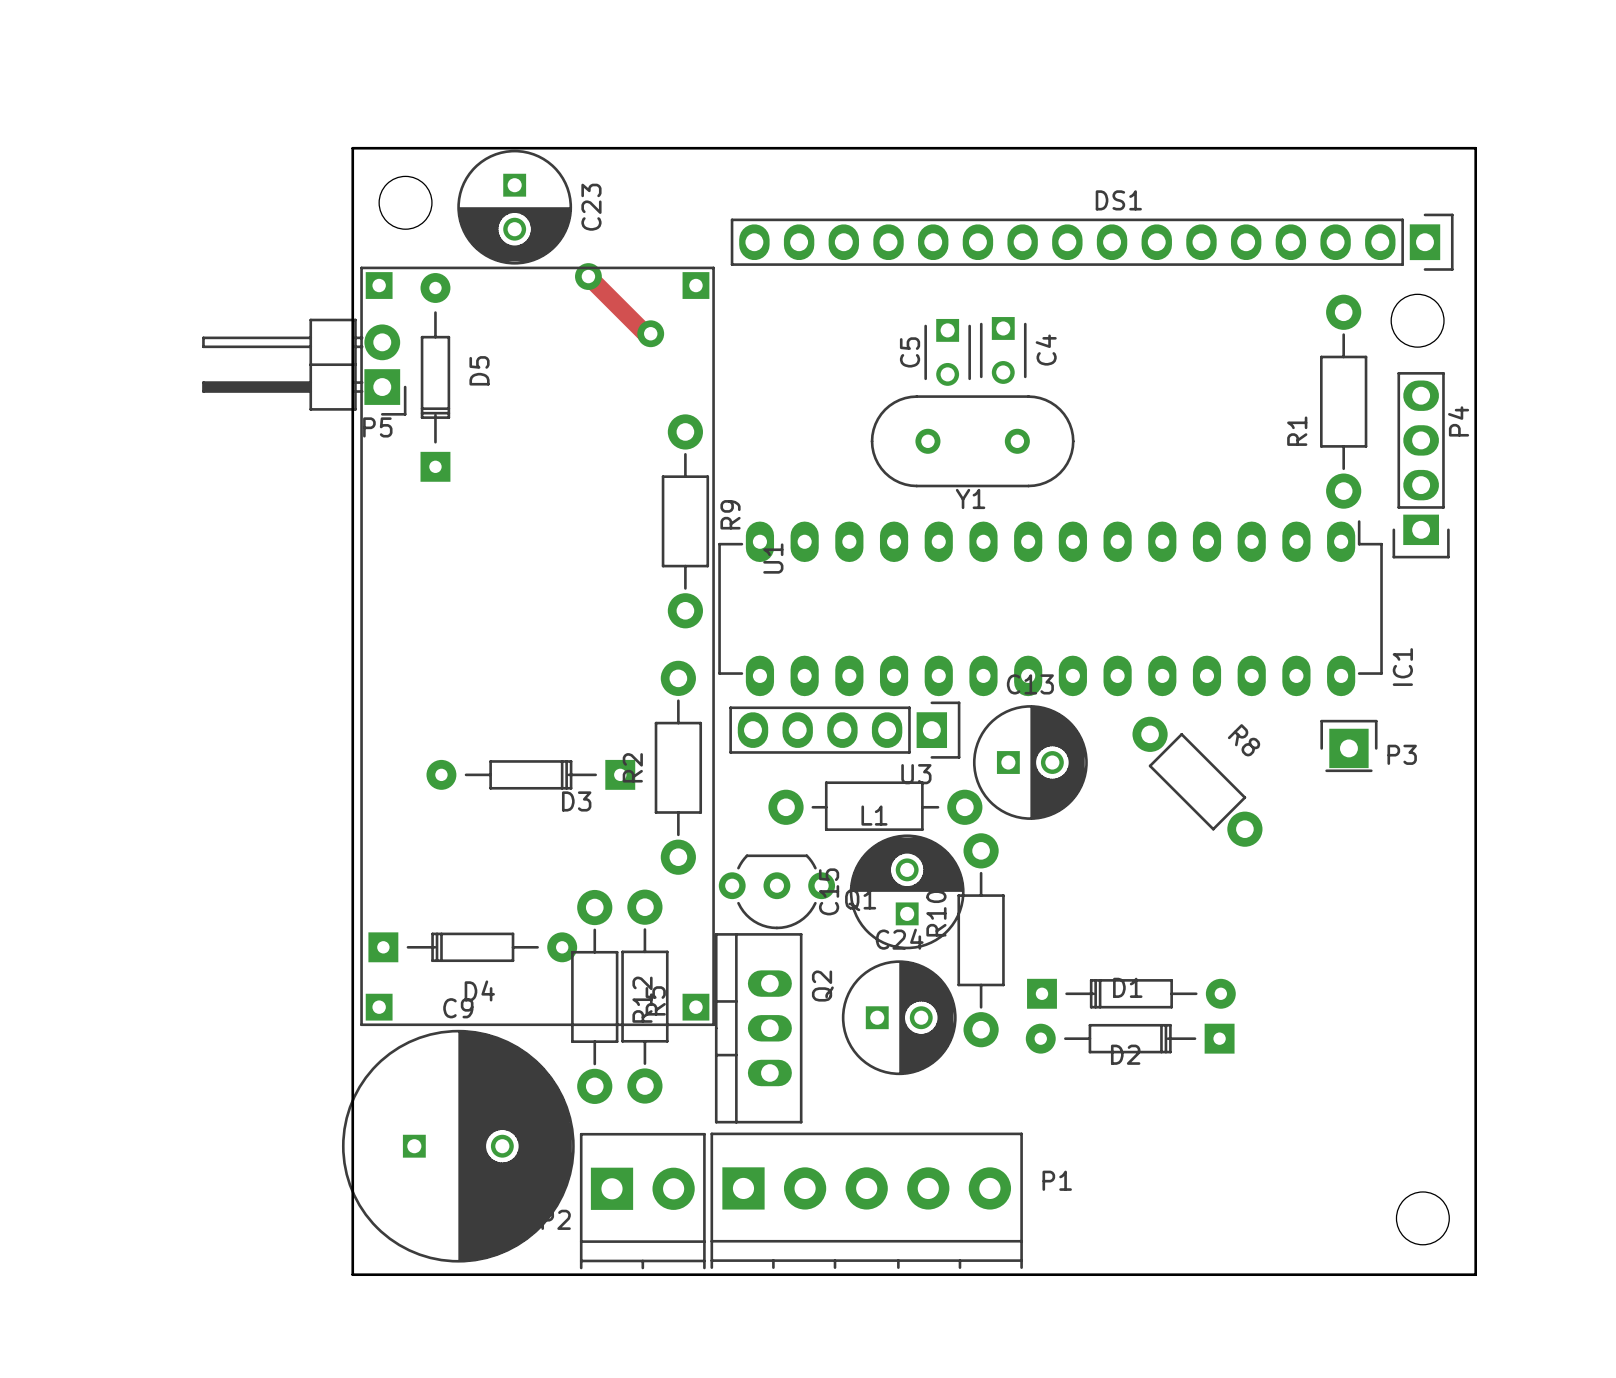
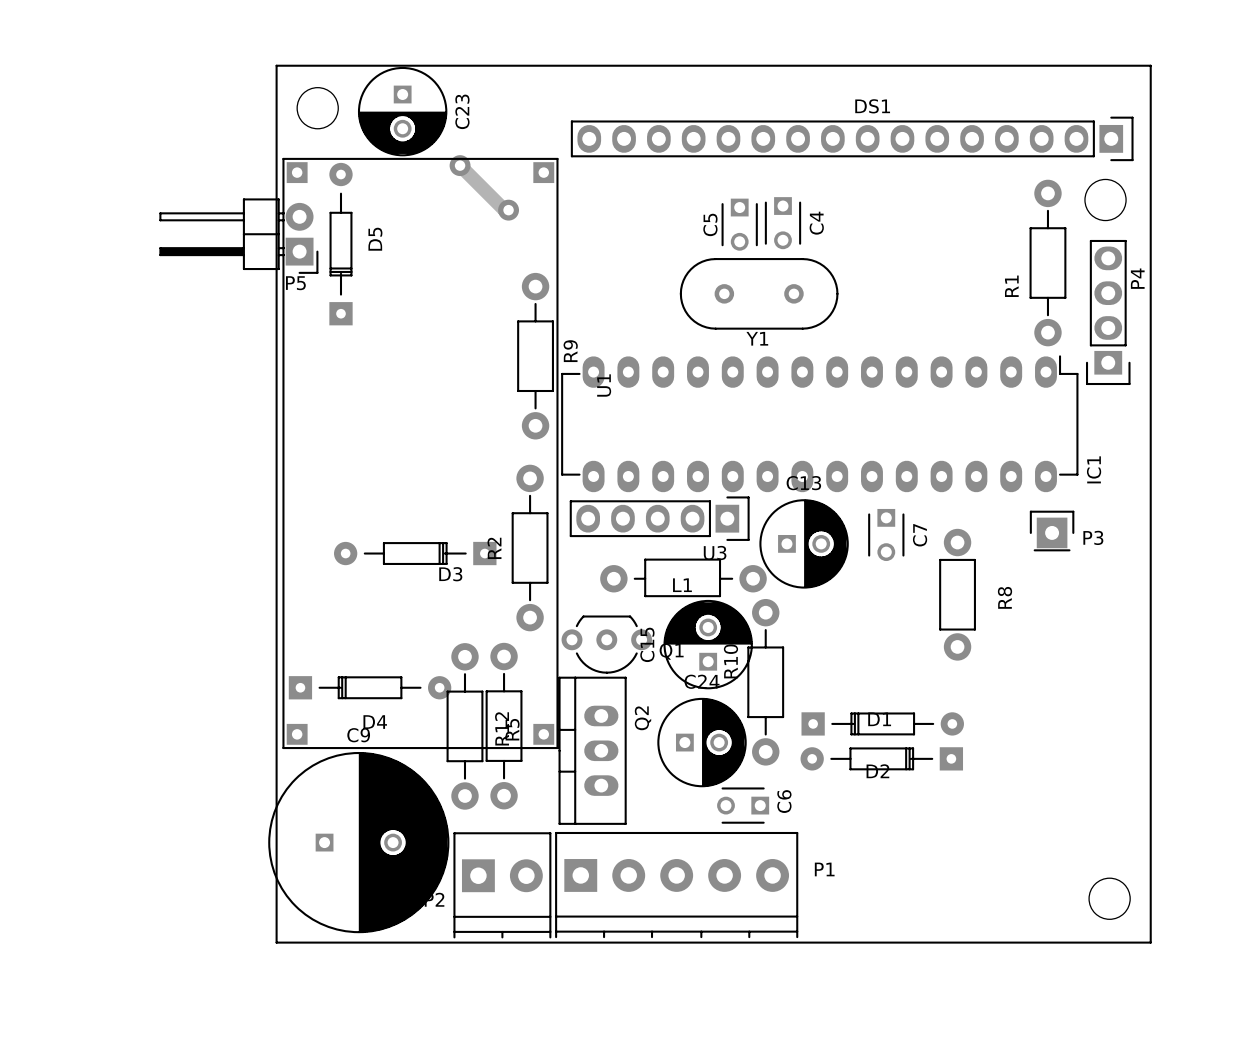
C7: none -> (886, 534)
R8 rotation: 0° (1197, 781) -> 45° clockwise (957, 594)
C6: none -> (743, 805)

